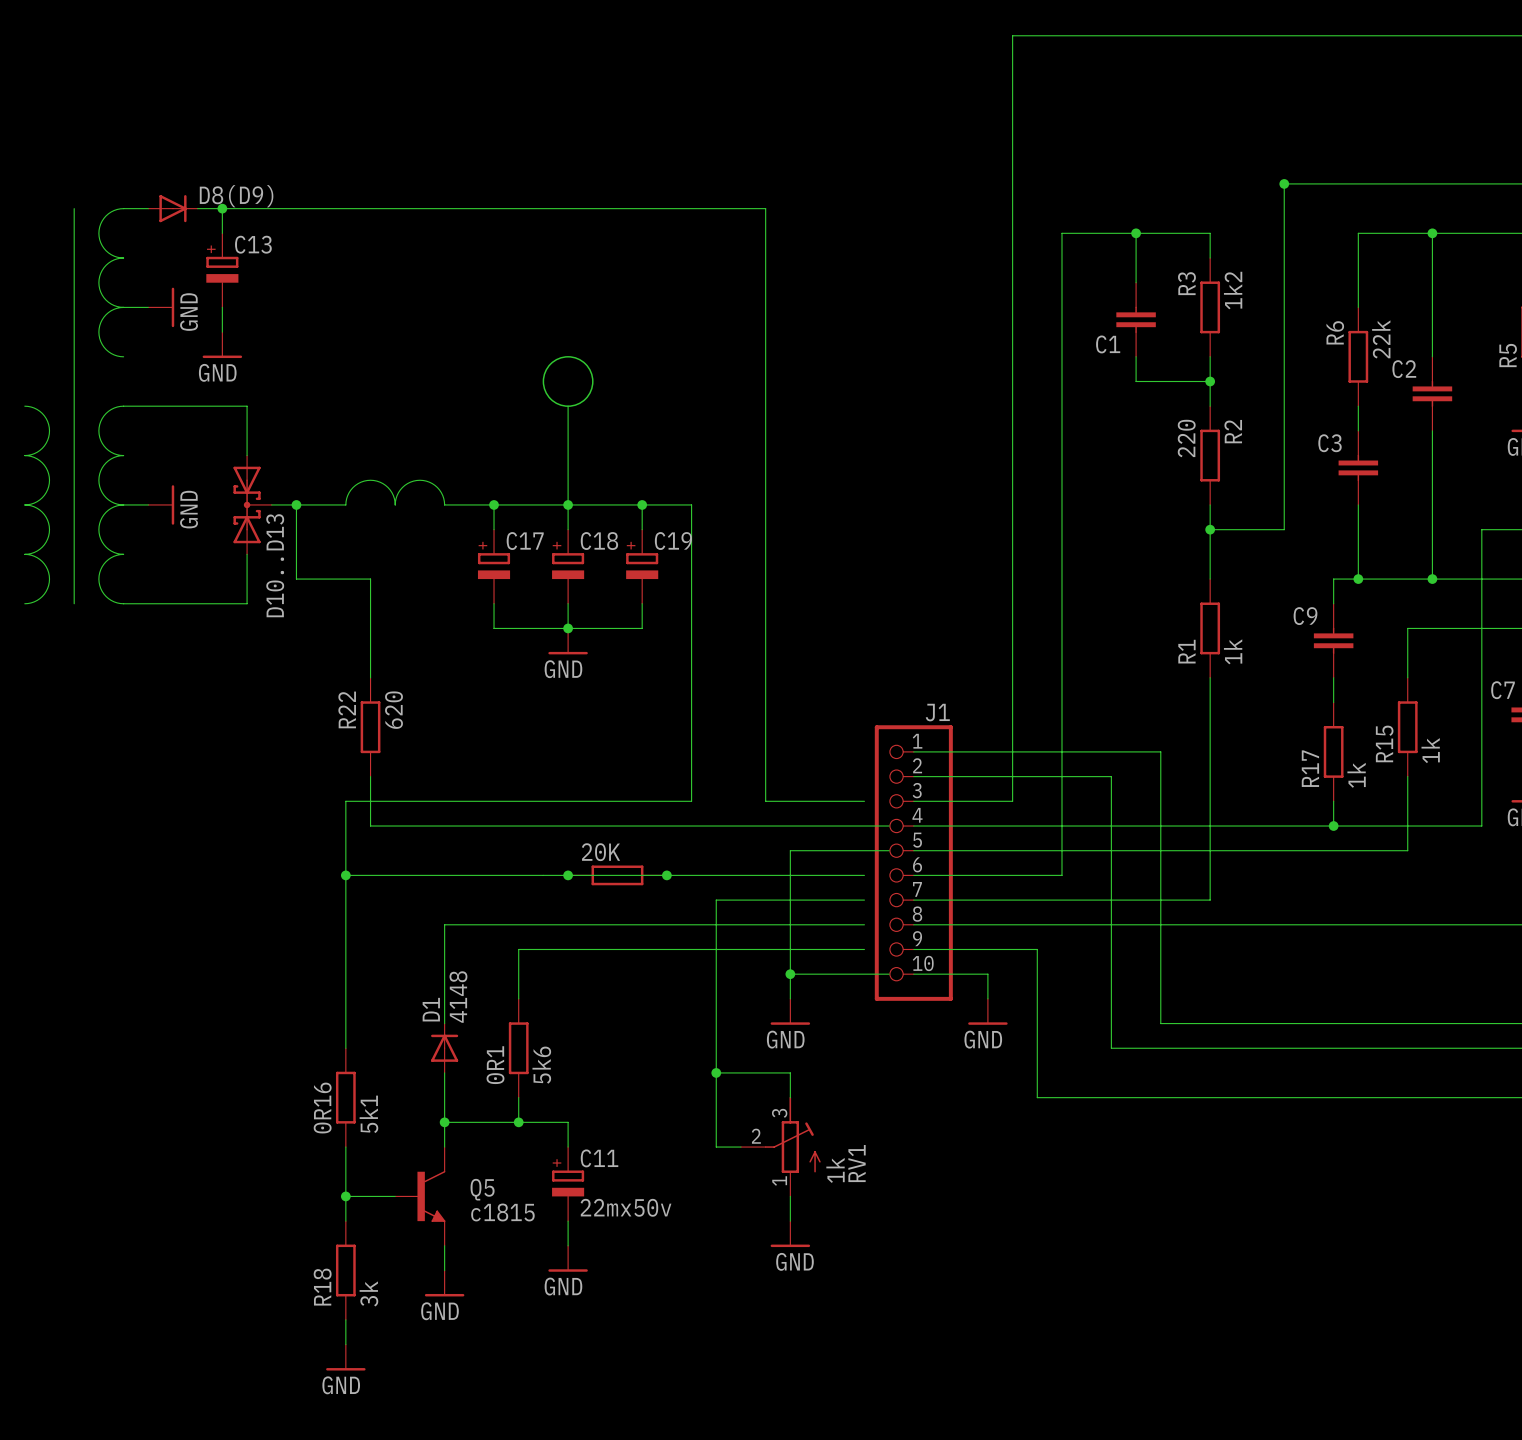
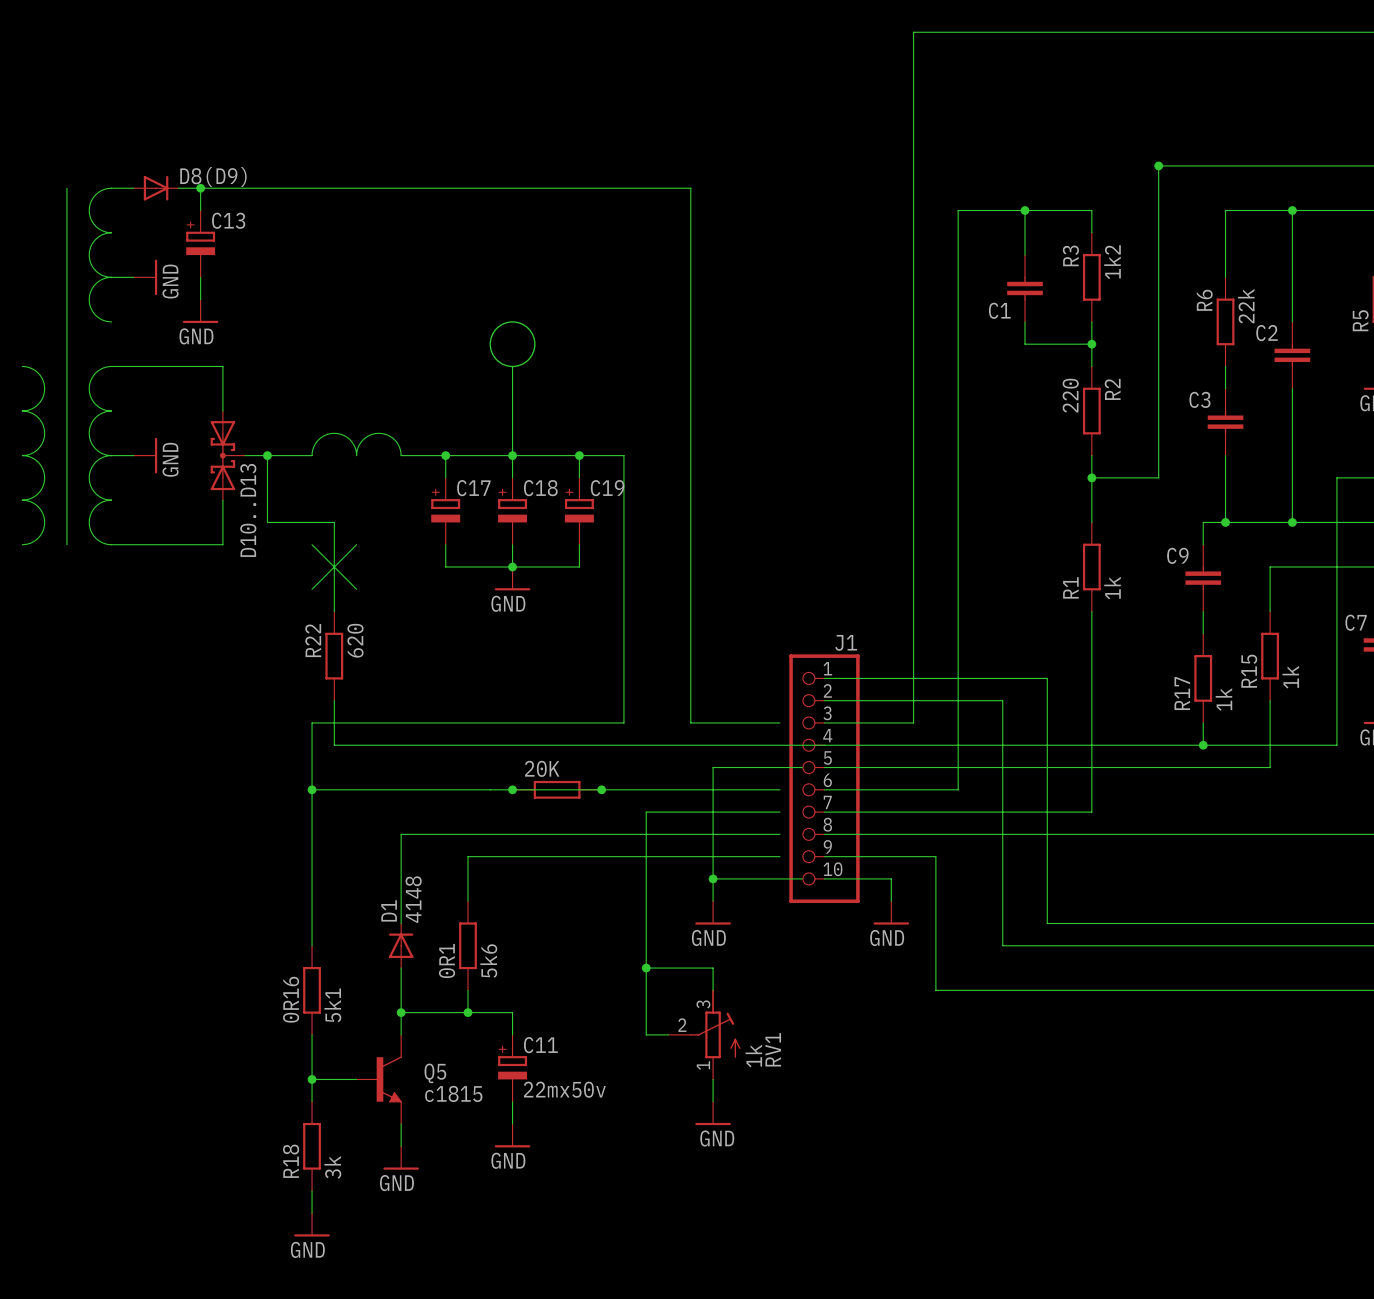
wire: none -> (312, 544) (356, 589)
wire: none -> (356, 544) (312, 589)
wire: none -> (802, 745) (824, 745)

